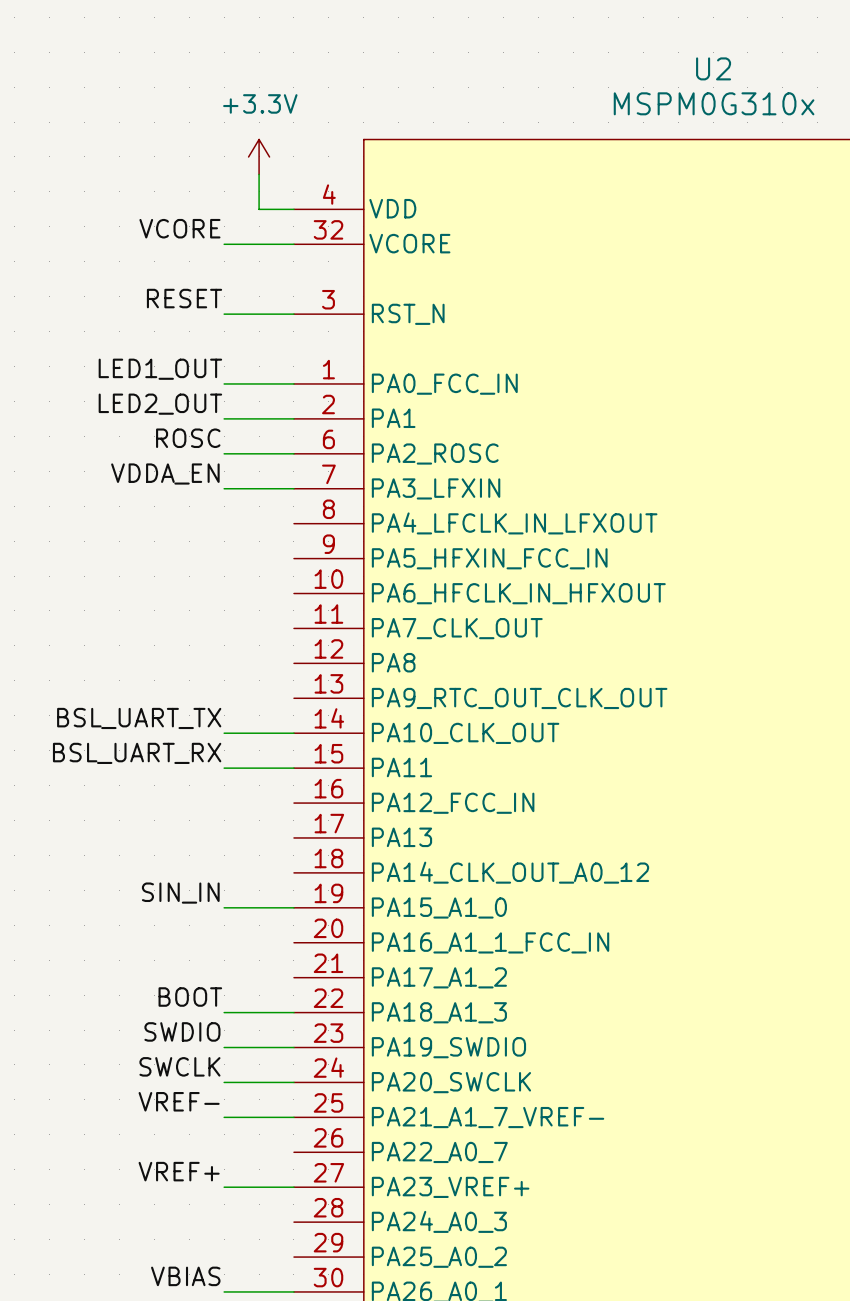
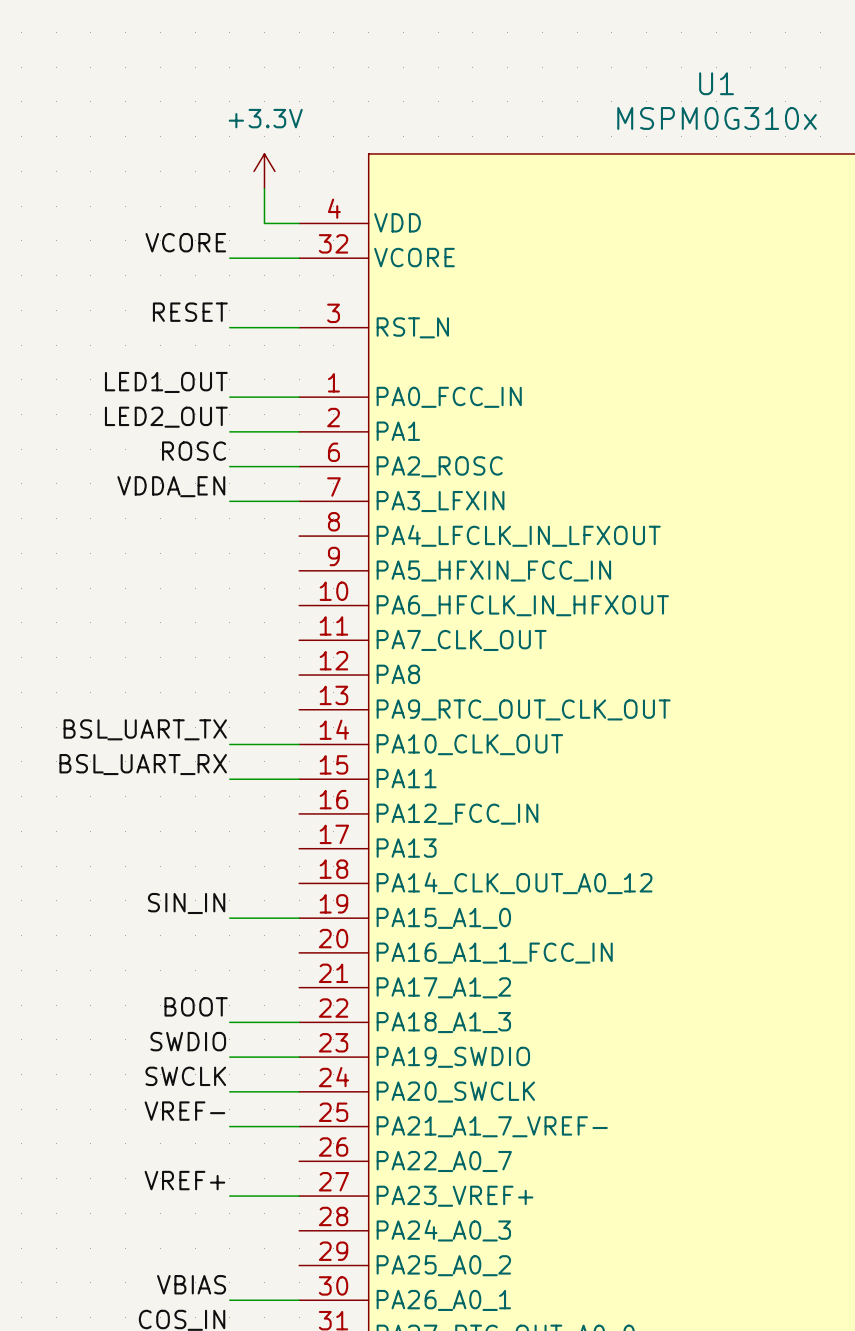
U2 name: U2 (713, 68) -> U1 (716, 83)

